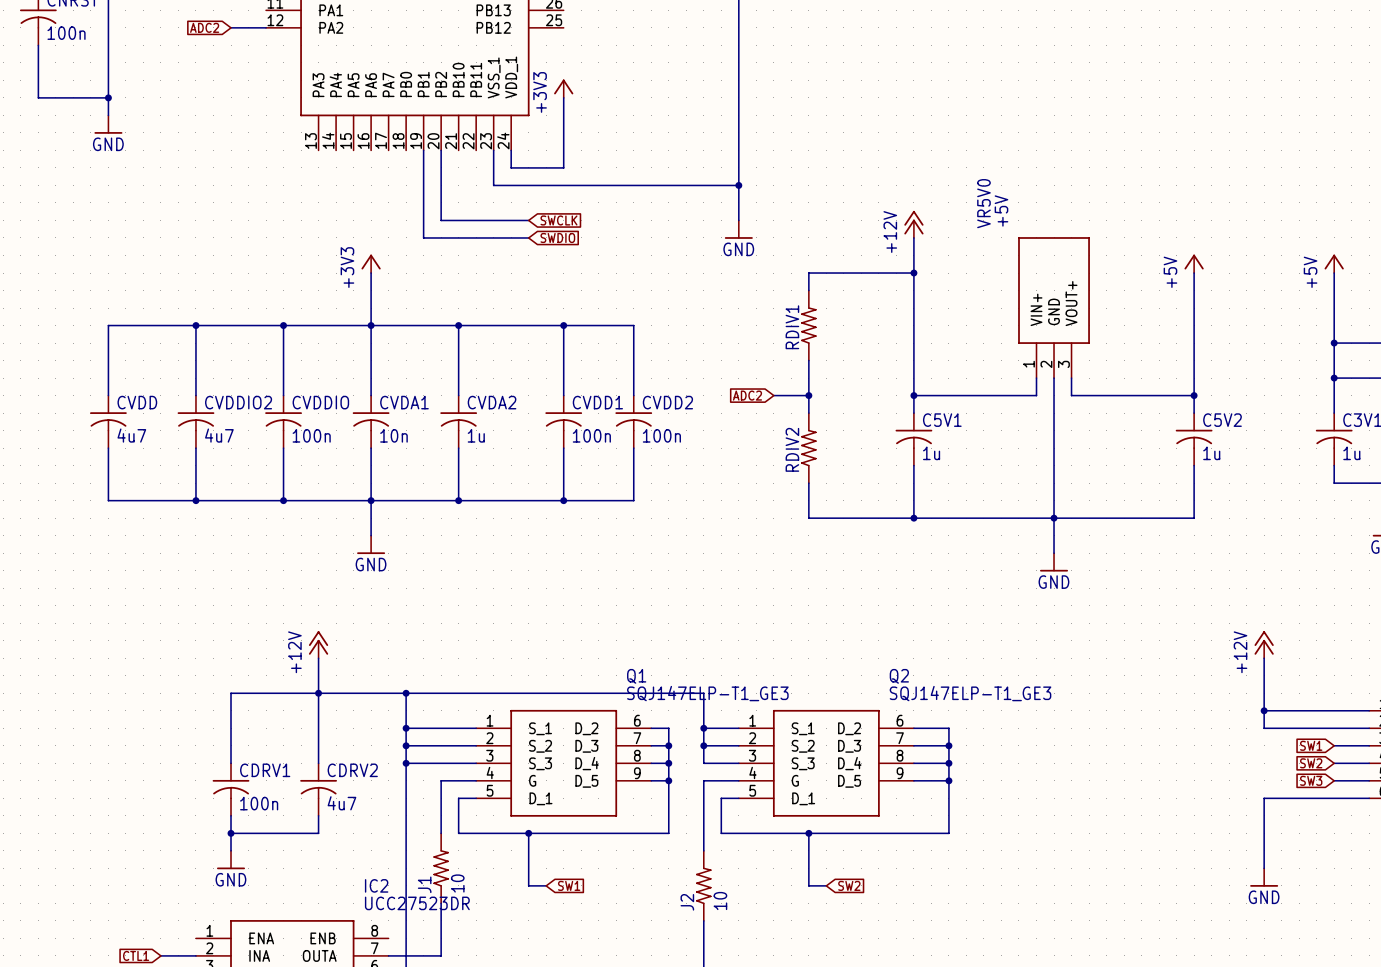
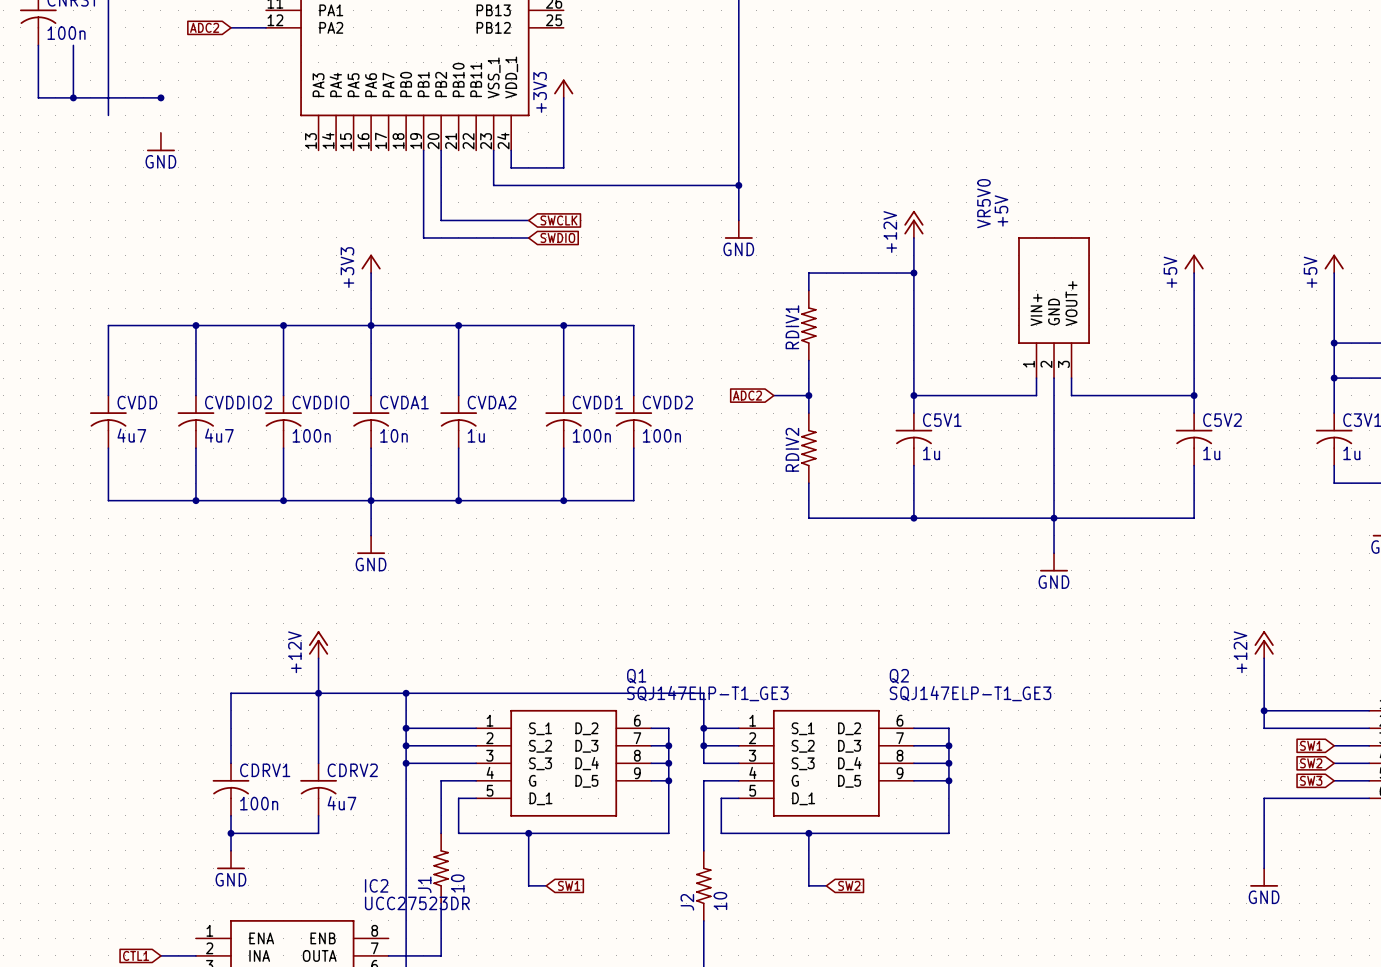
wire: none -> (73, 45) (73, 97)
junction: none -> (73, 97)
wire: none -> (108, 97) (160, 97)
junction: (108, 97) -> none
junction: none -> (160, 97)
power symbol position: GND (108, 124) -> GND (160, 142)

